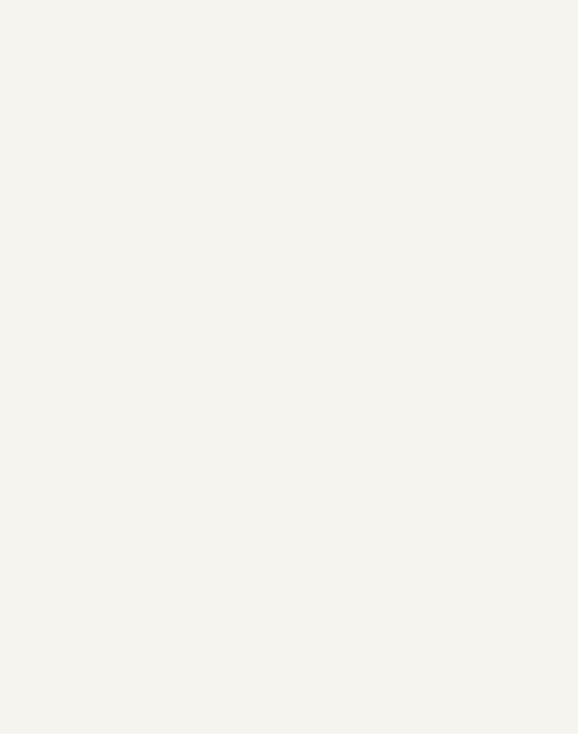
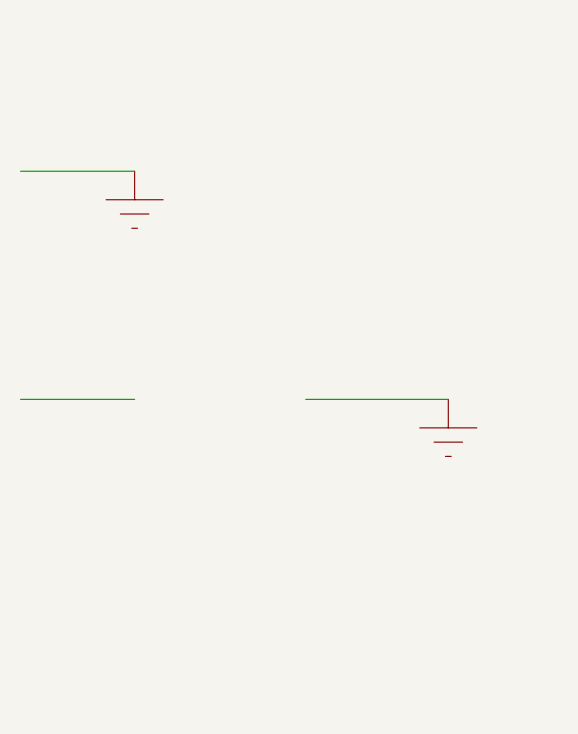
wire: none -> (20, 171) (134, 171)
power symbol: none -> (134, 199)
wire: none -> (20, 399) (134, 399)
wire: none -> (305, 399) (448, 399)
power symbol: none -> (448, 427)

